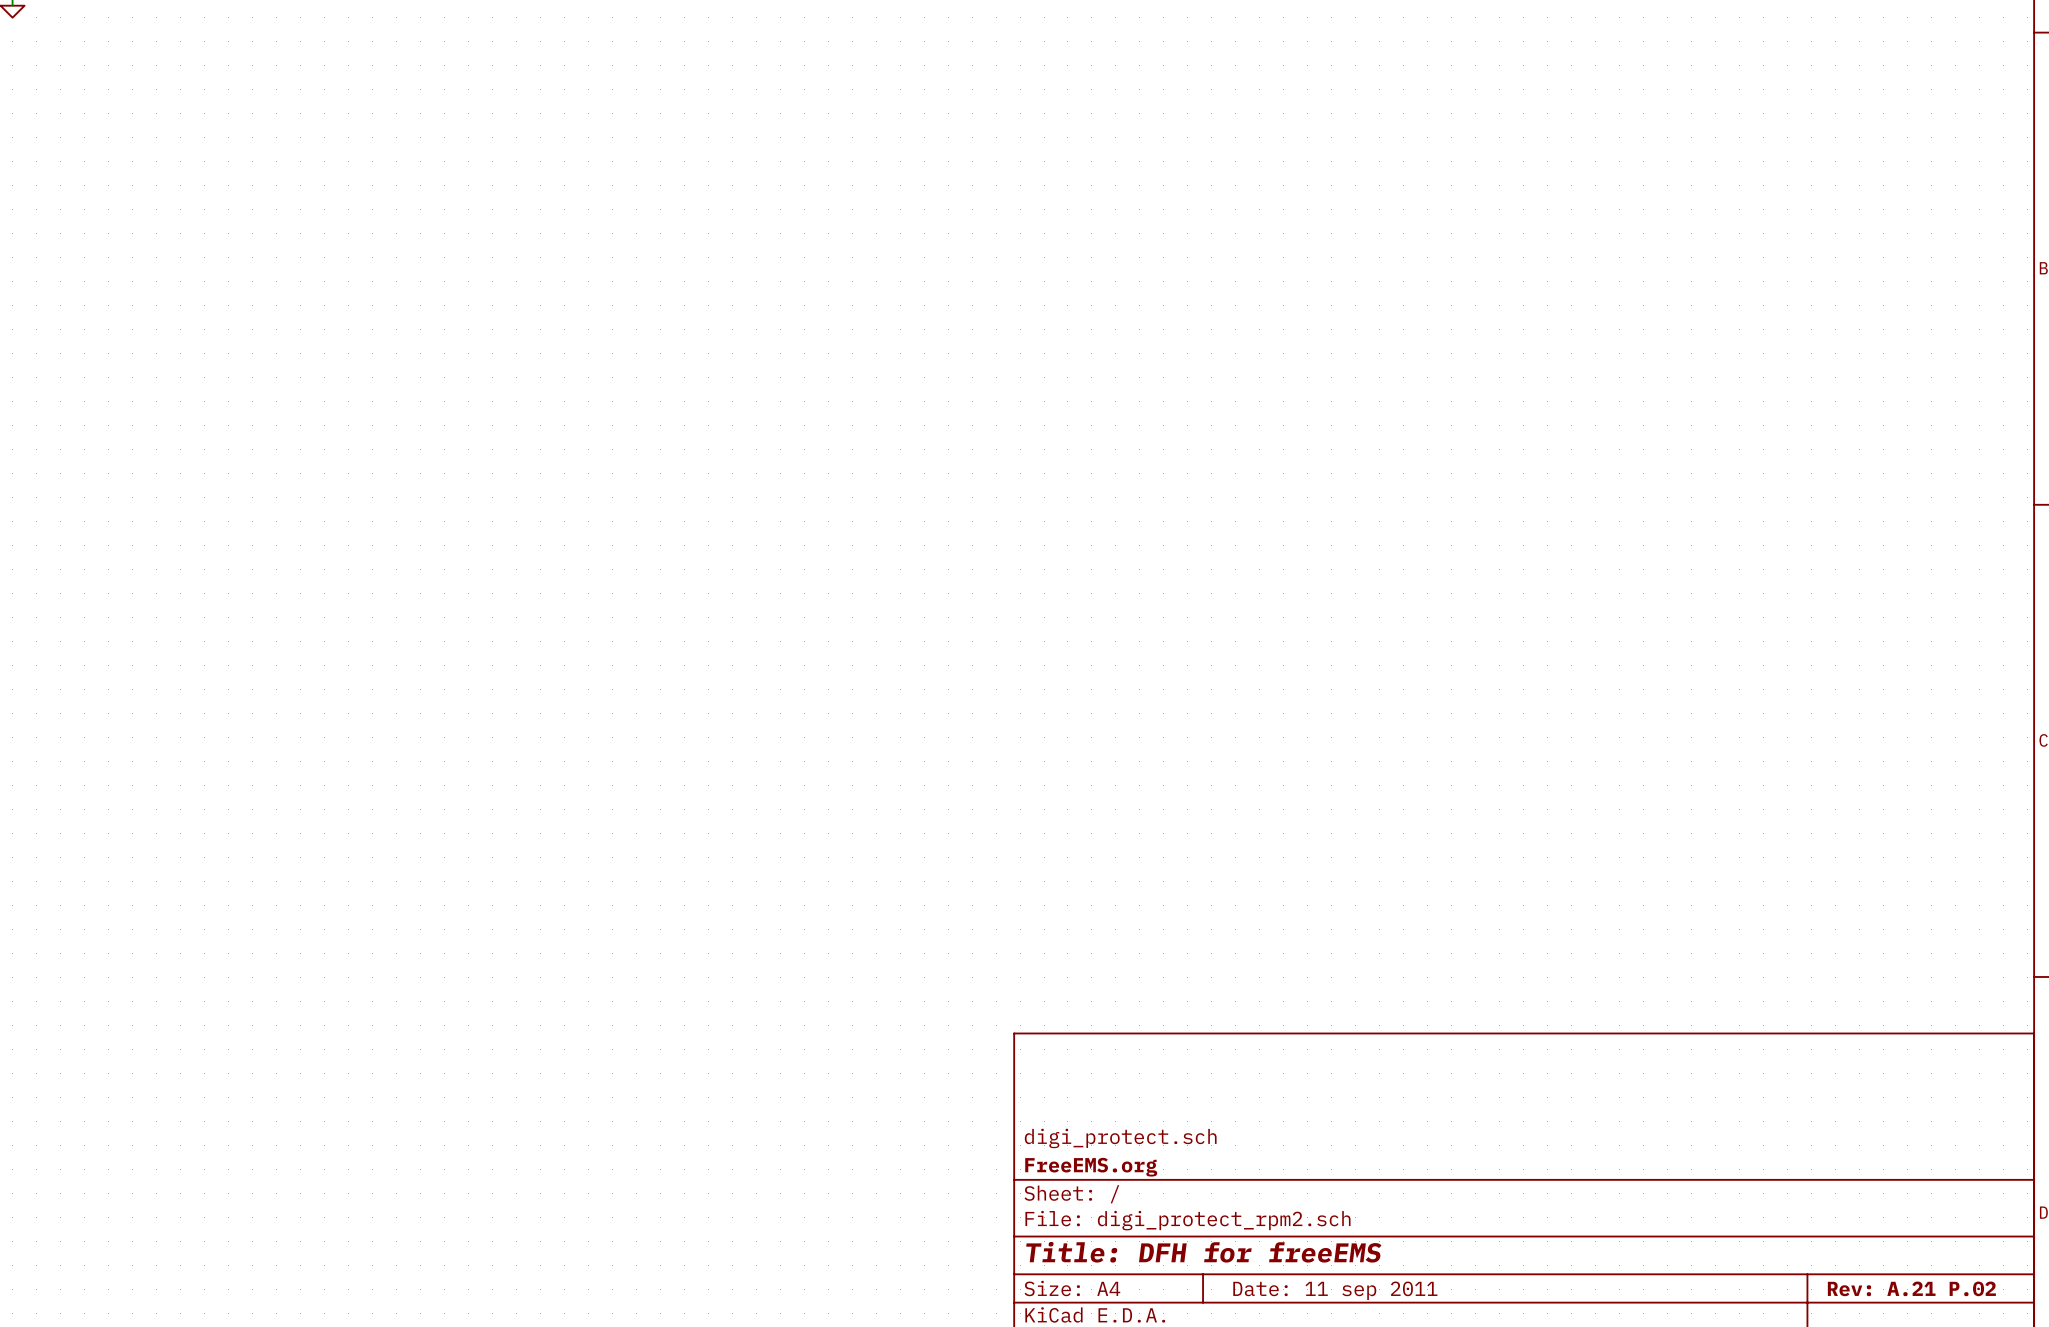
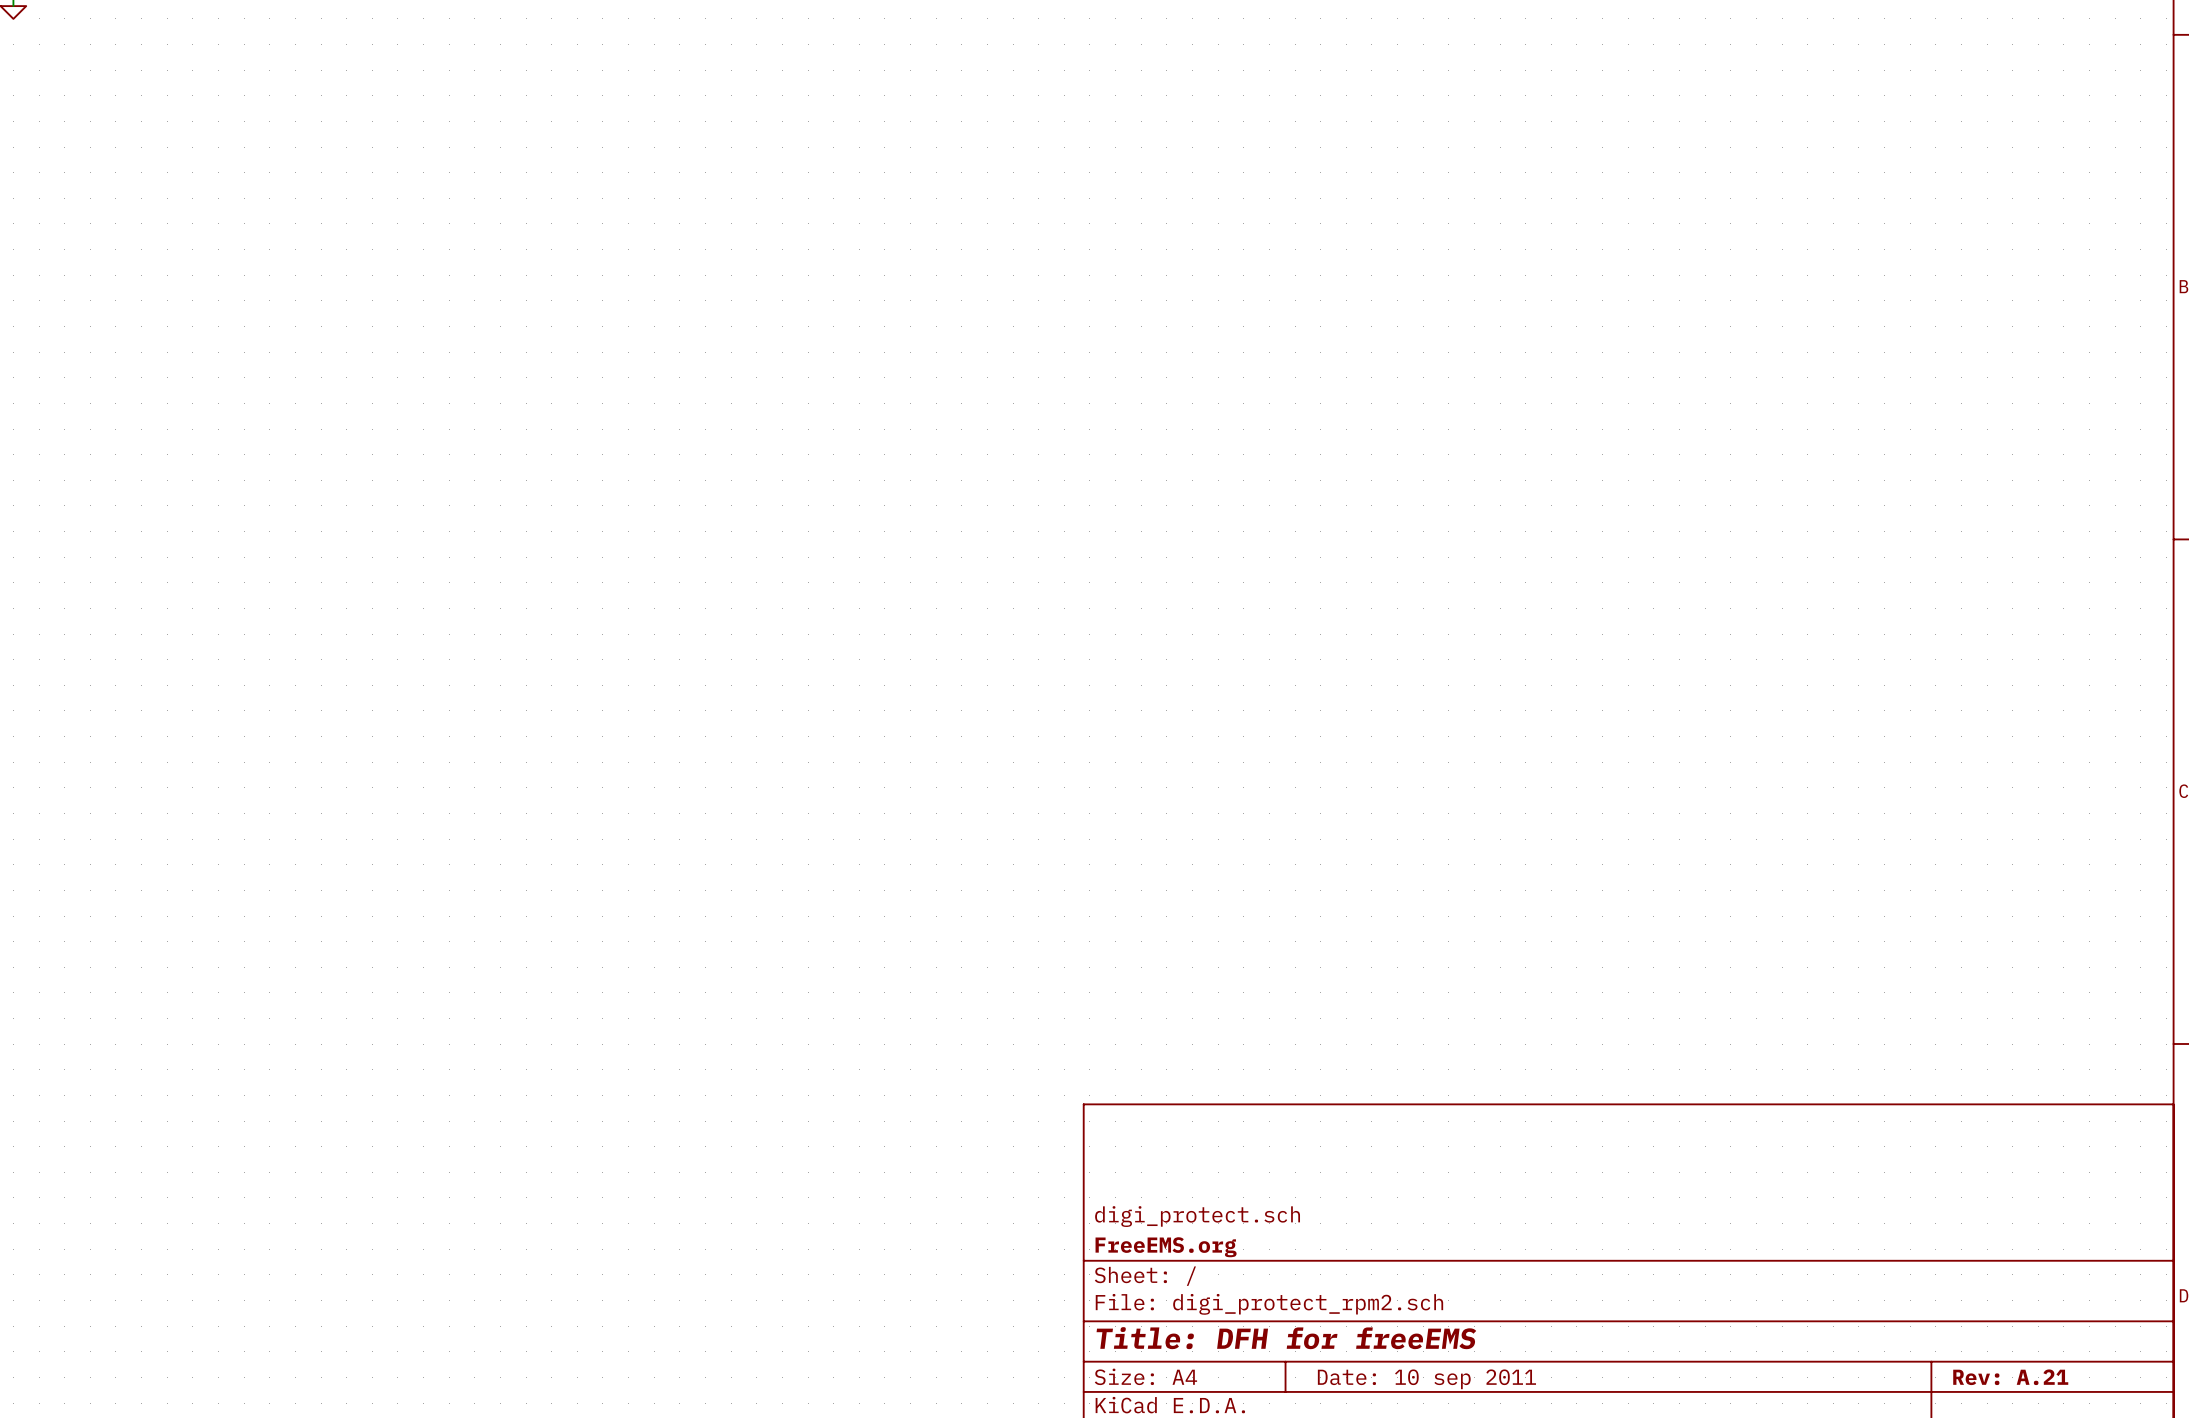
title block: Rev: A.21 P.02 (1911, 1288) -> Rev: A.21 (2010, 1377)
title block: Date: 11 sep 2011 (1335, 1290) -> Date: 10 sep 2011 (1426, 1379)

